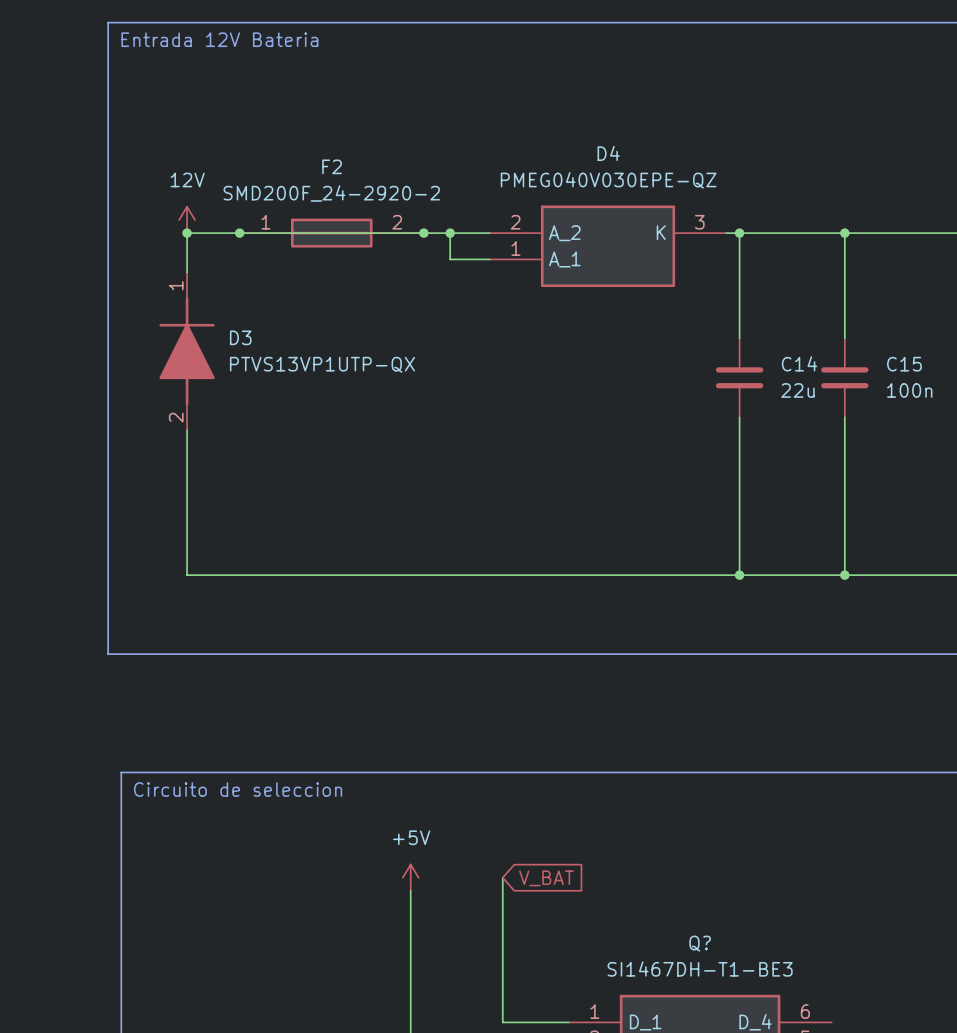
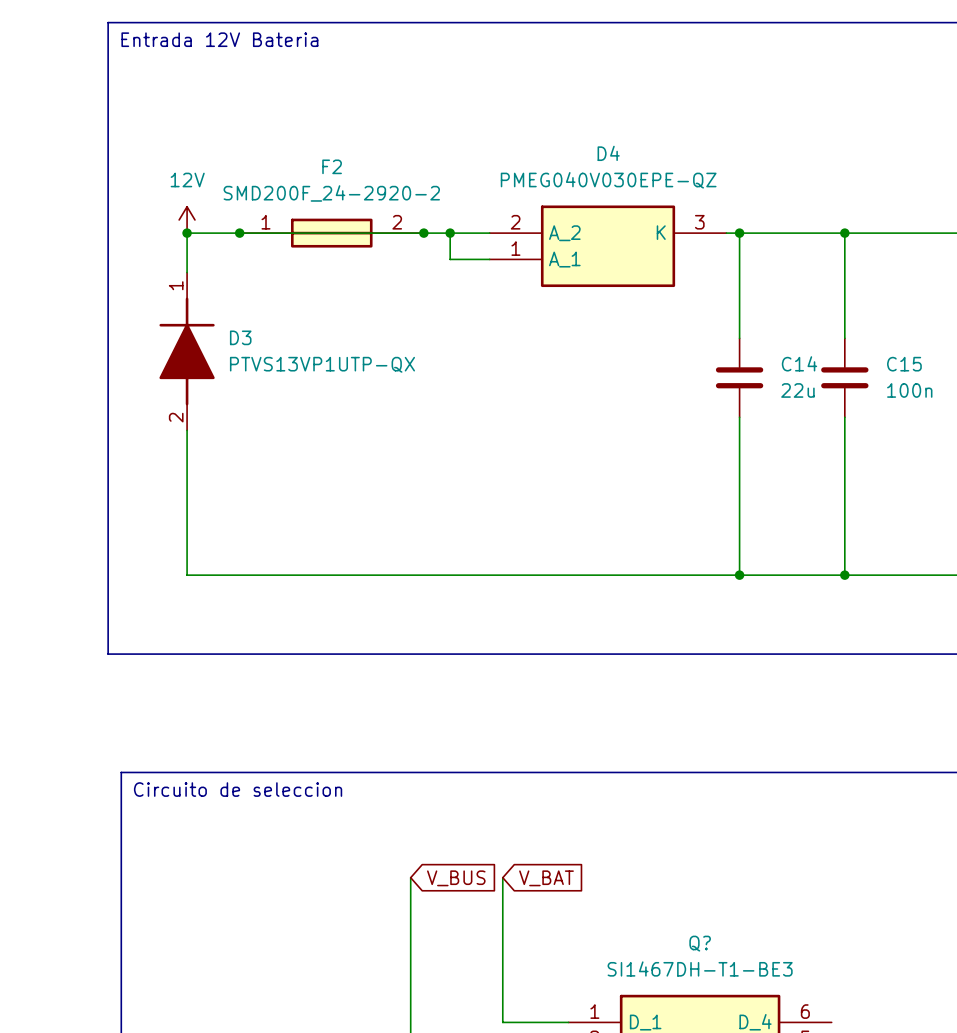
power symbol: +5V (410, 877) -> none
global label: none -> V_BUS (456, 878)

